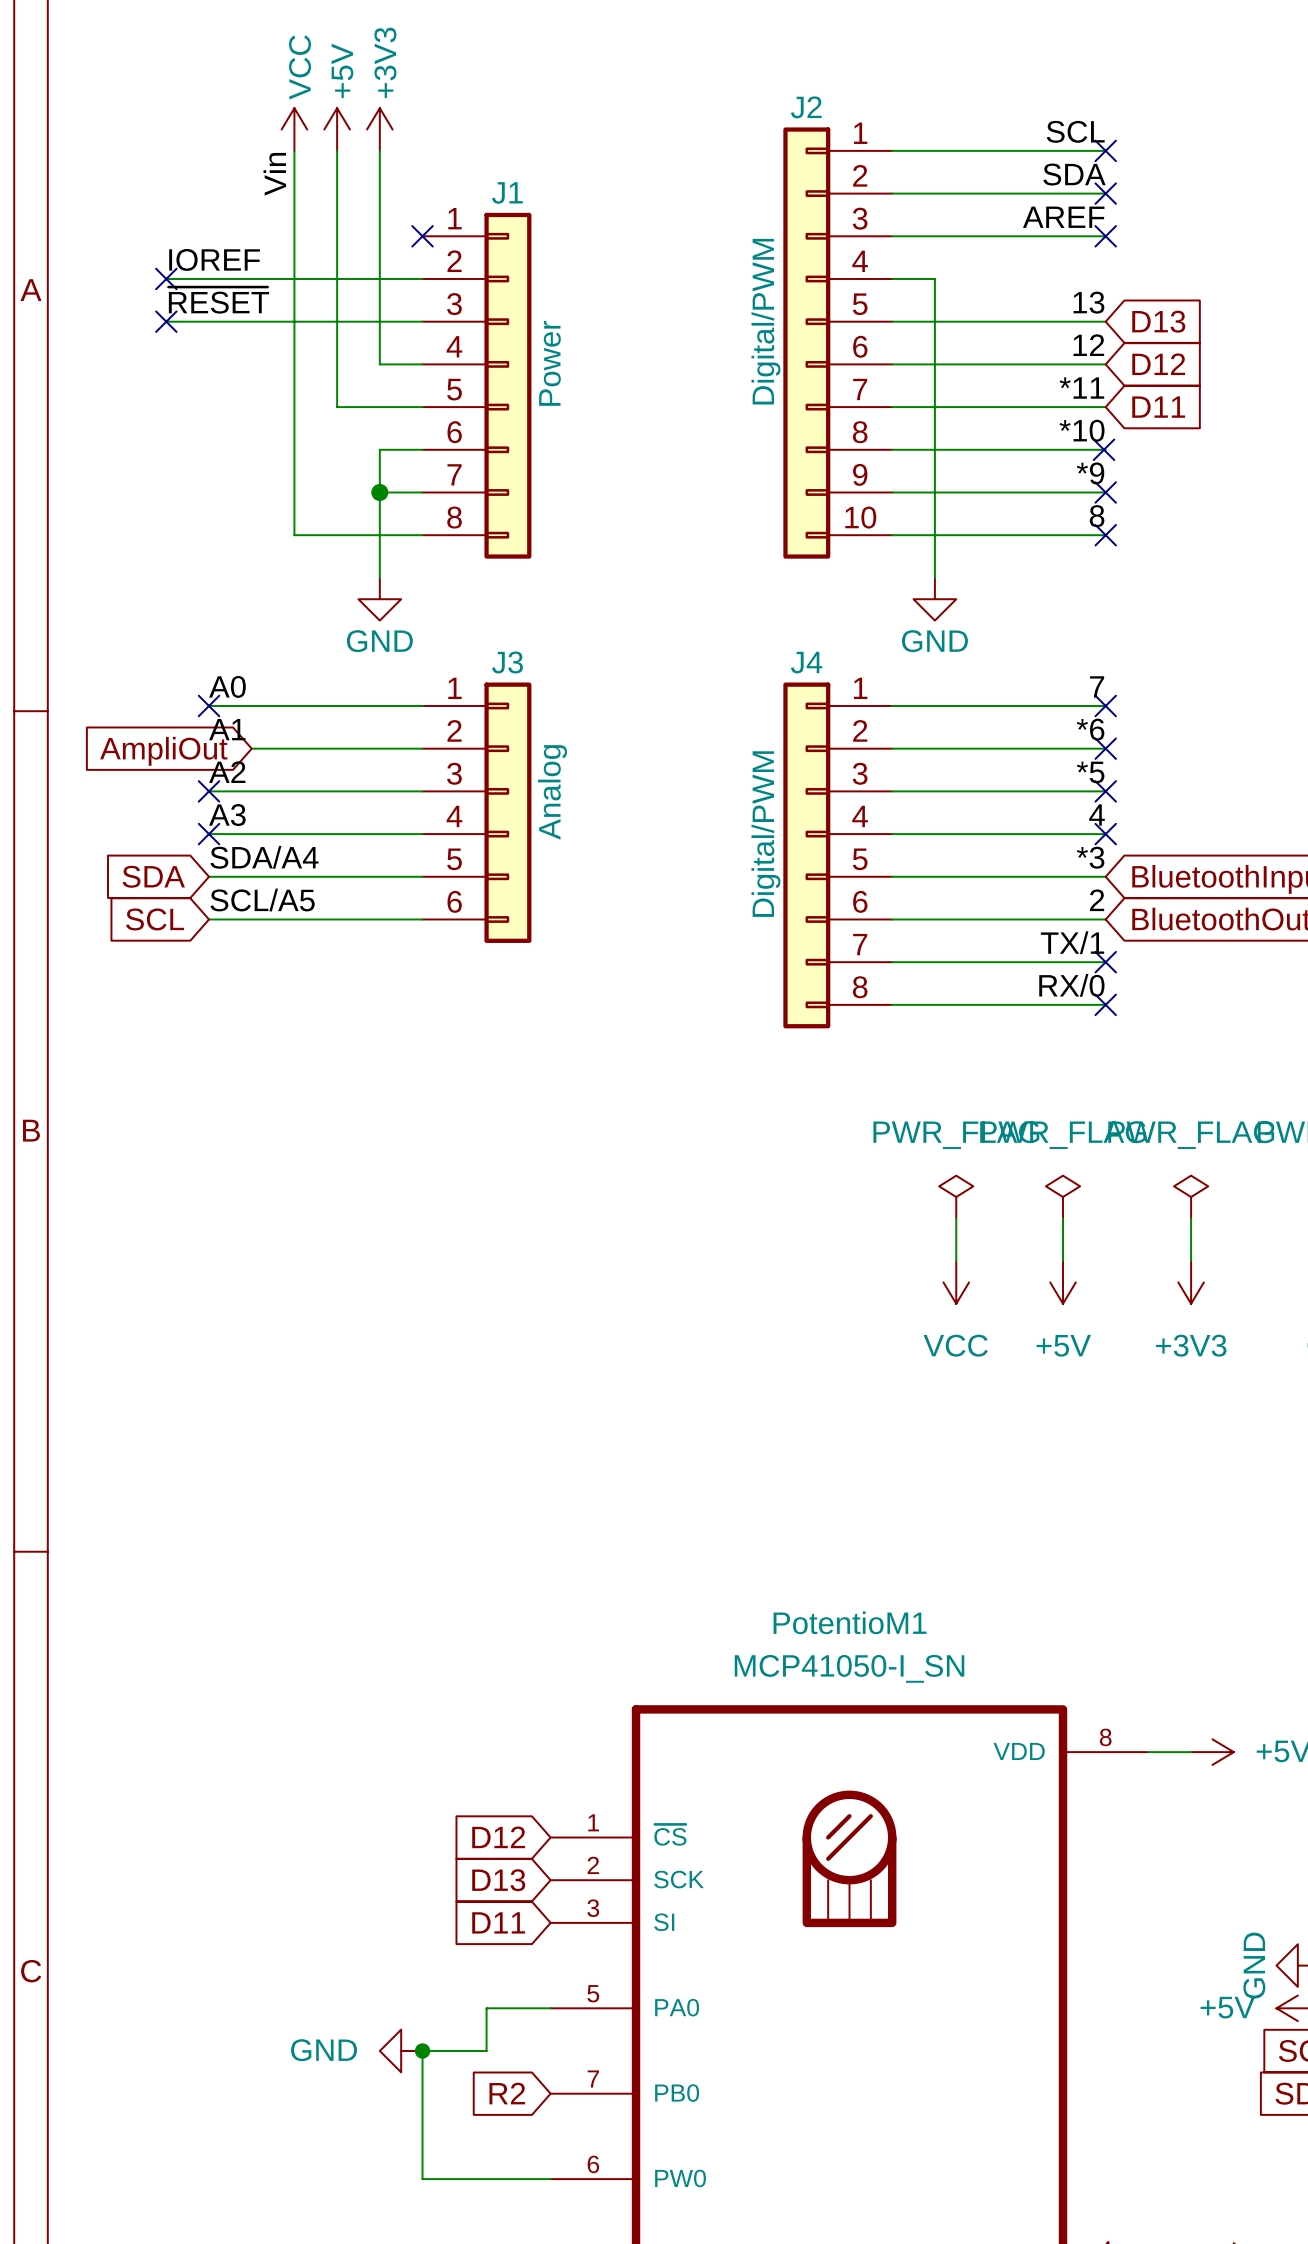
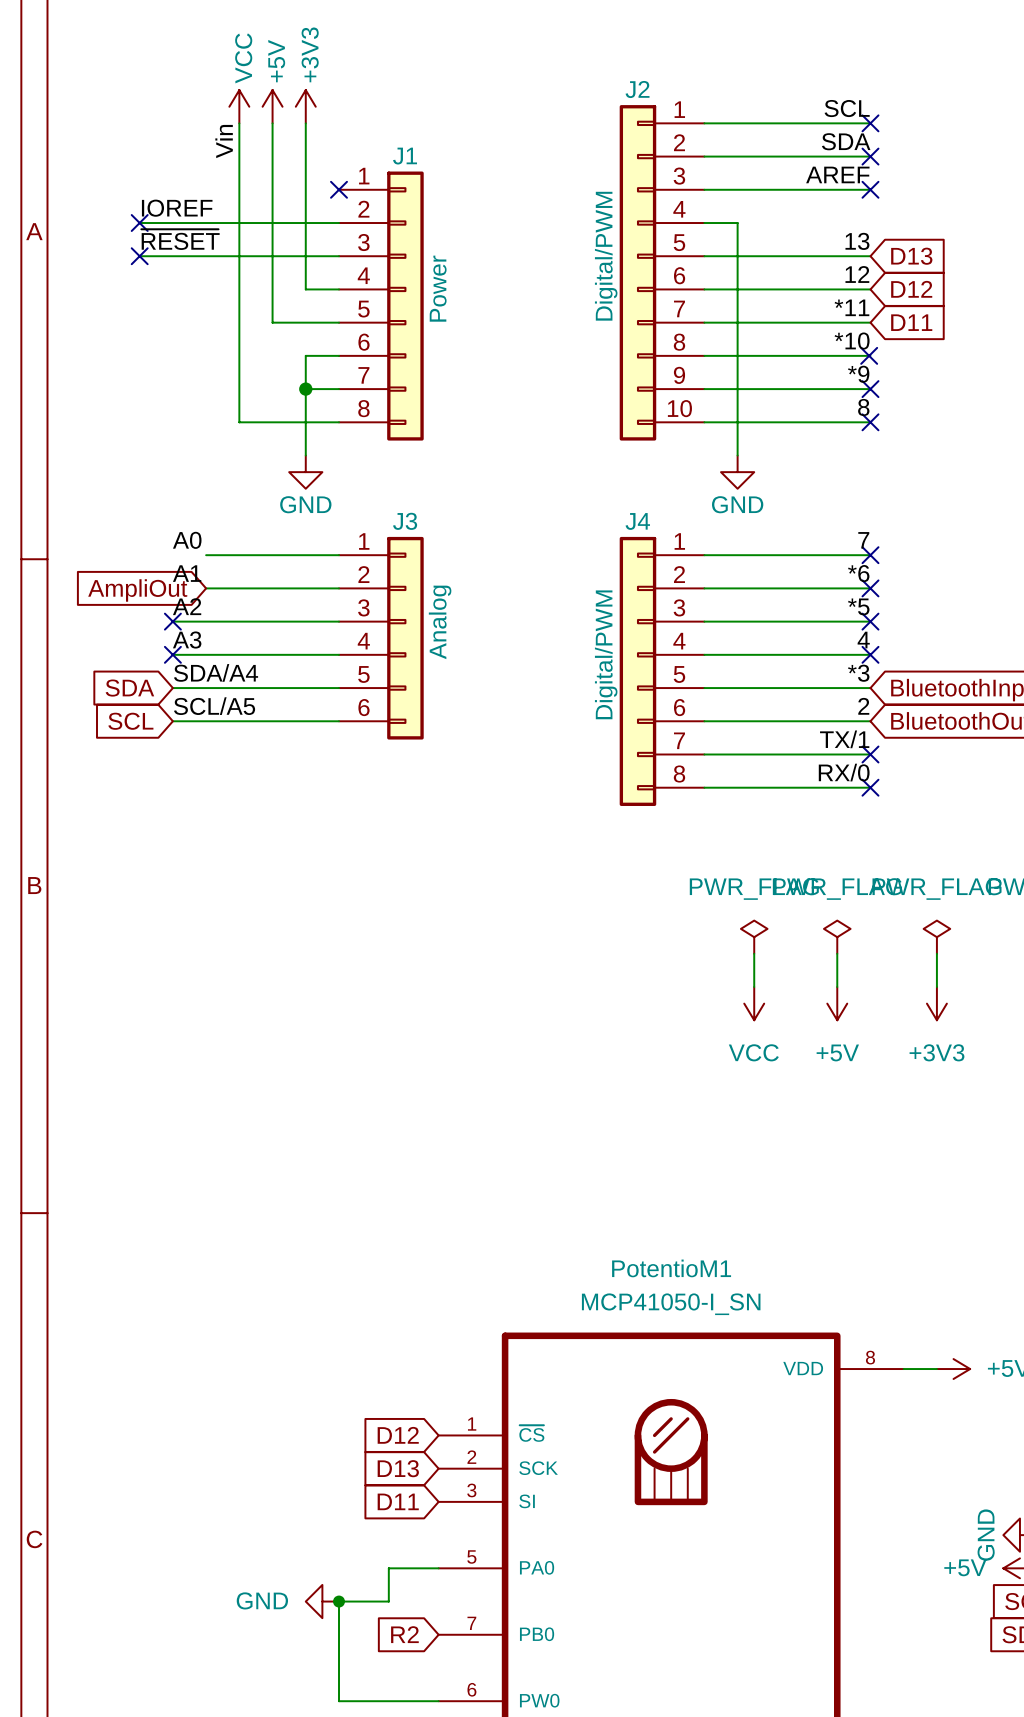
wire: (209, 705) (251, 705) -> none
no-connect mark: (209, 705) -> none

